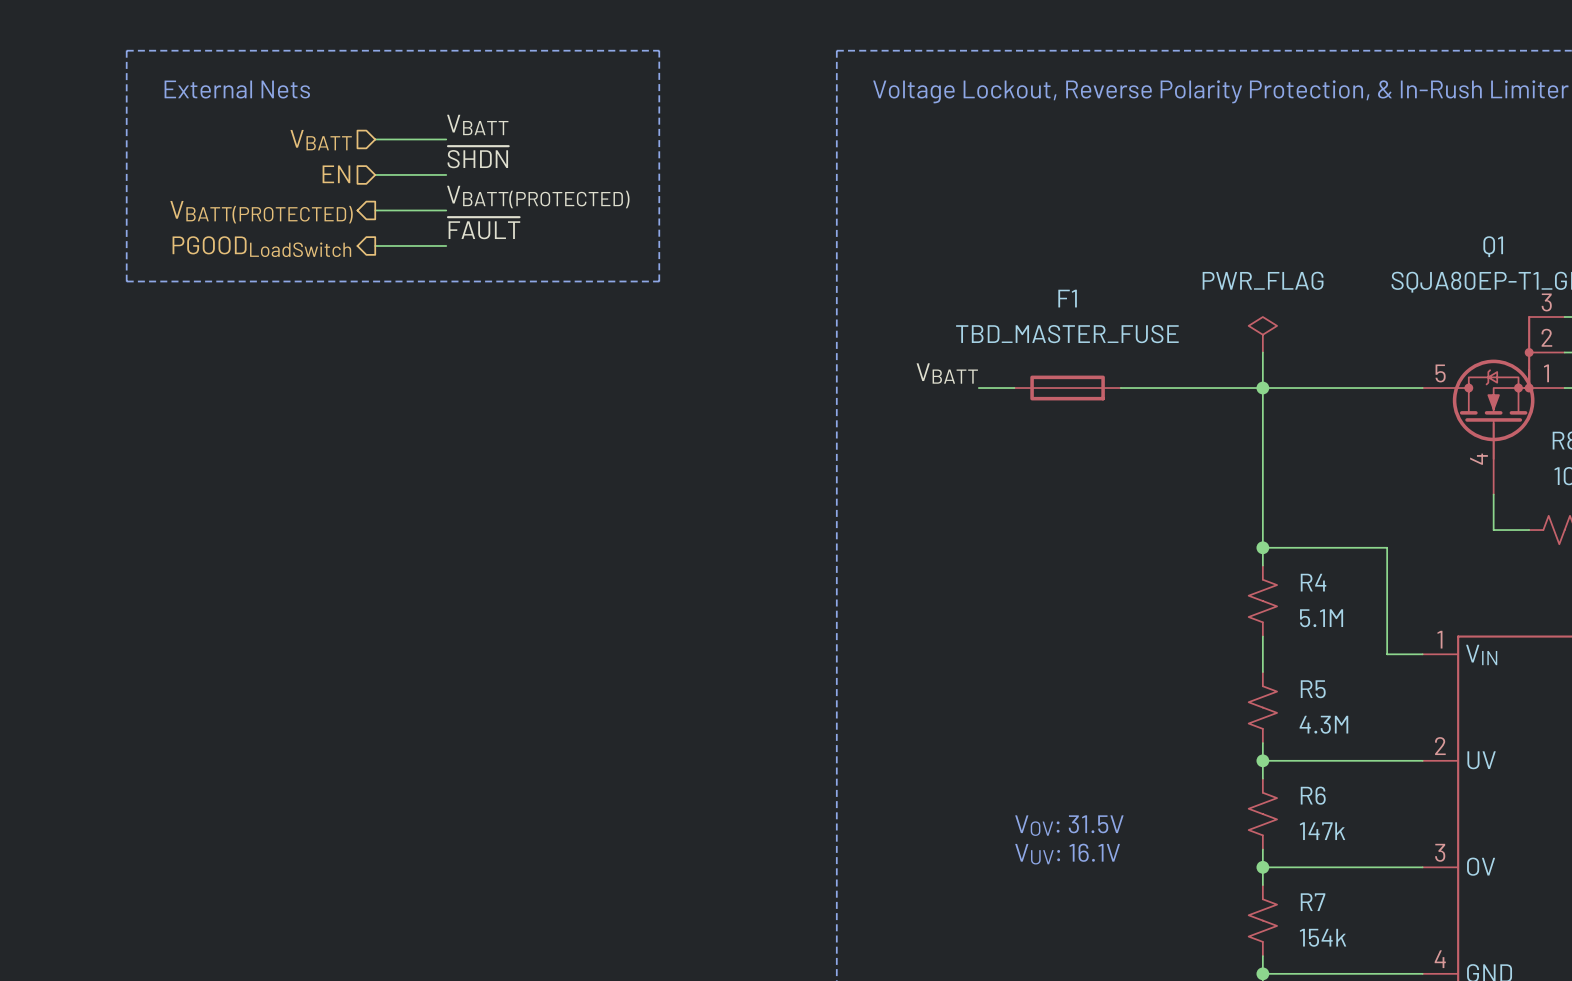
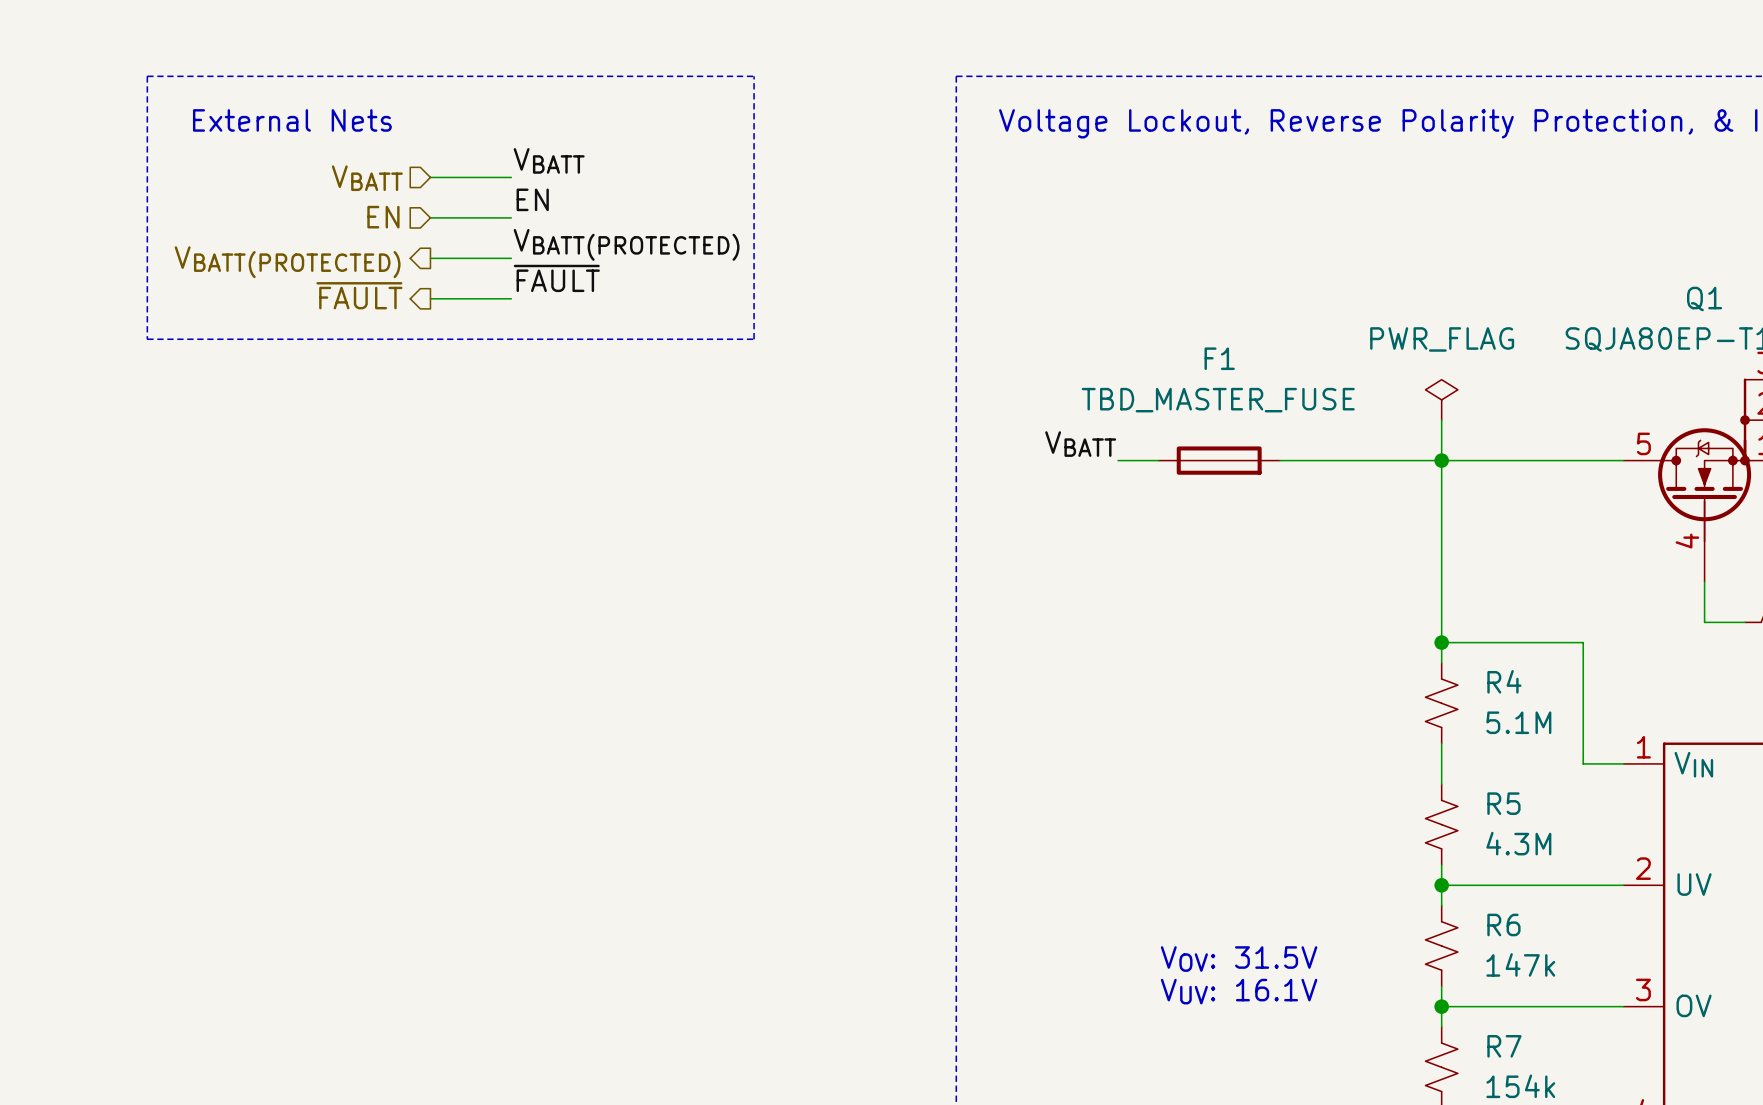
label: ~{SHDN} (478, 157) -> EN (532, 199)
hierarchical label: PGOODLoadSwitch (261, 246) -> ~{FAULT} (359, 295)

